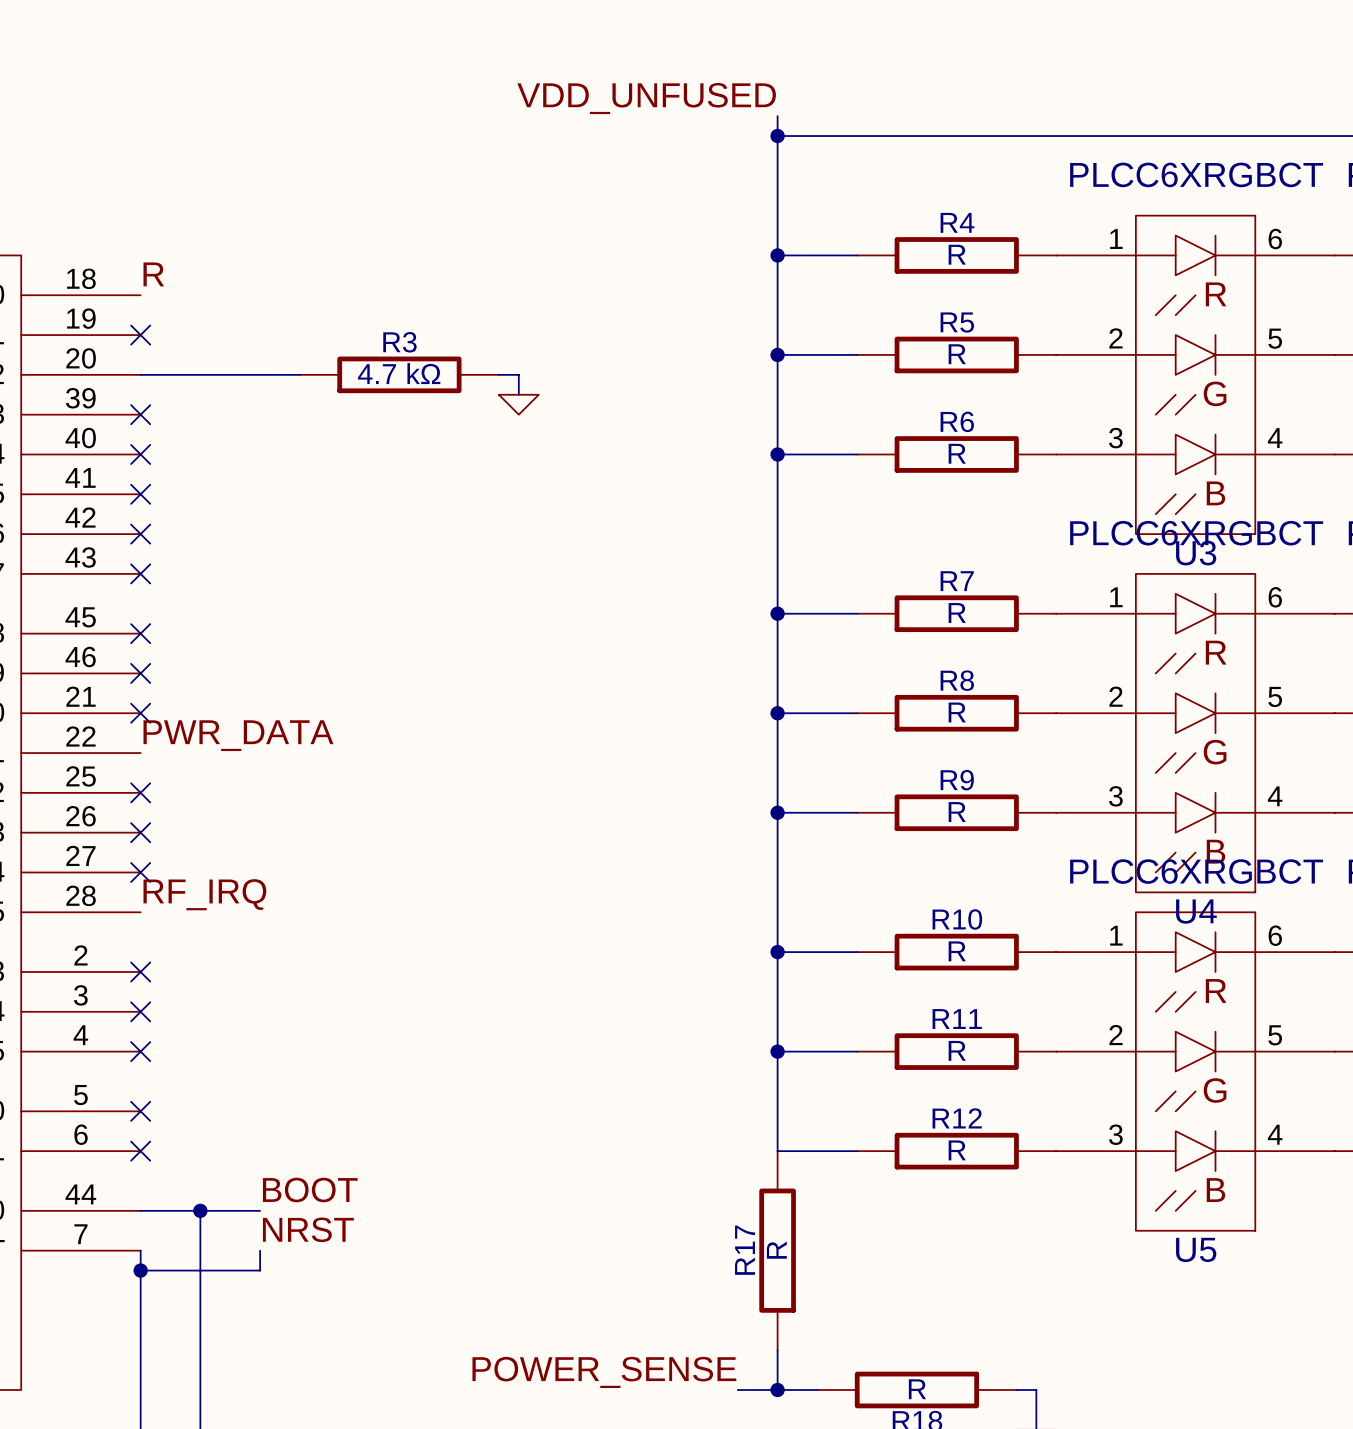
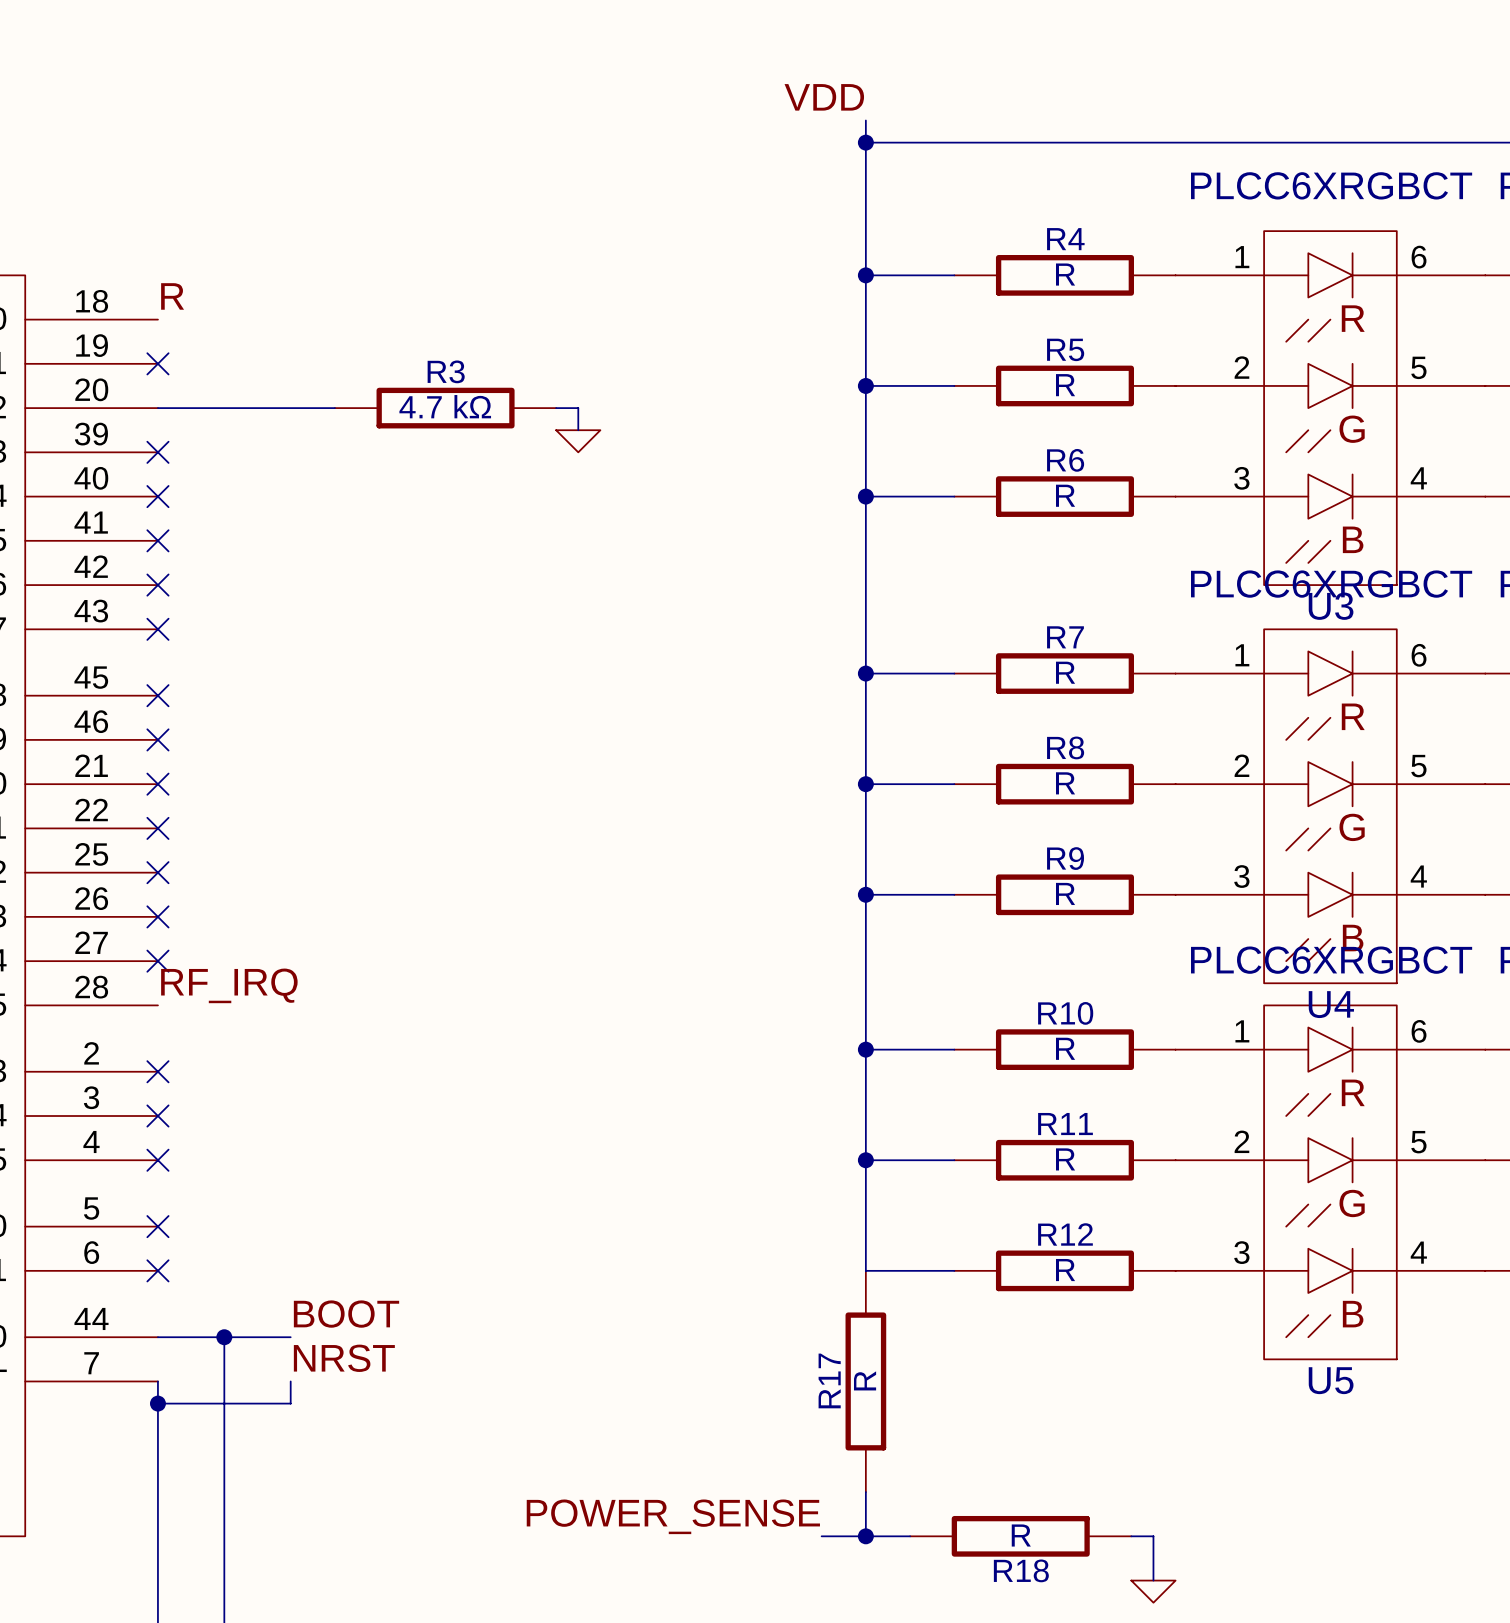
label: VDD_UNFUSED (646, 98) -> VDD (824, 97)
label: PWR_DATA (238, 735) -> none
no-connect mark: none -> (157, 828)

